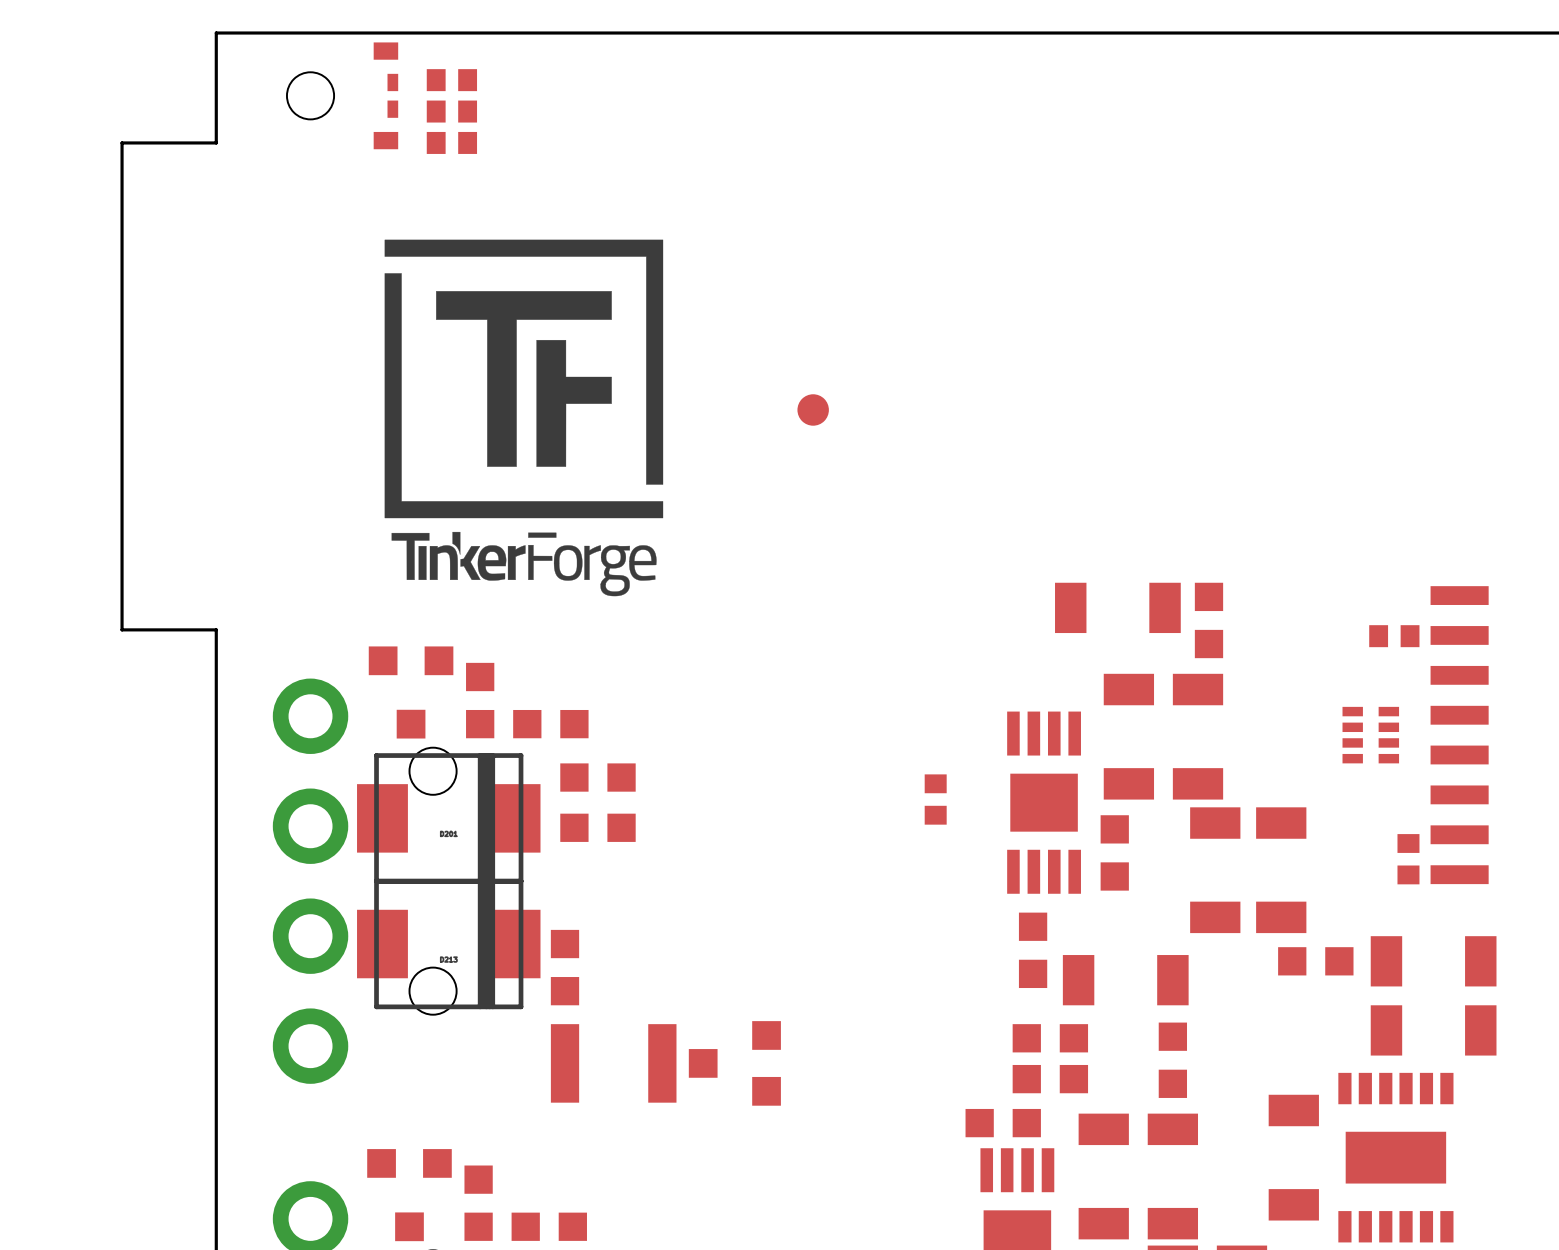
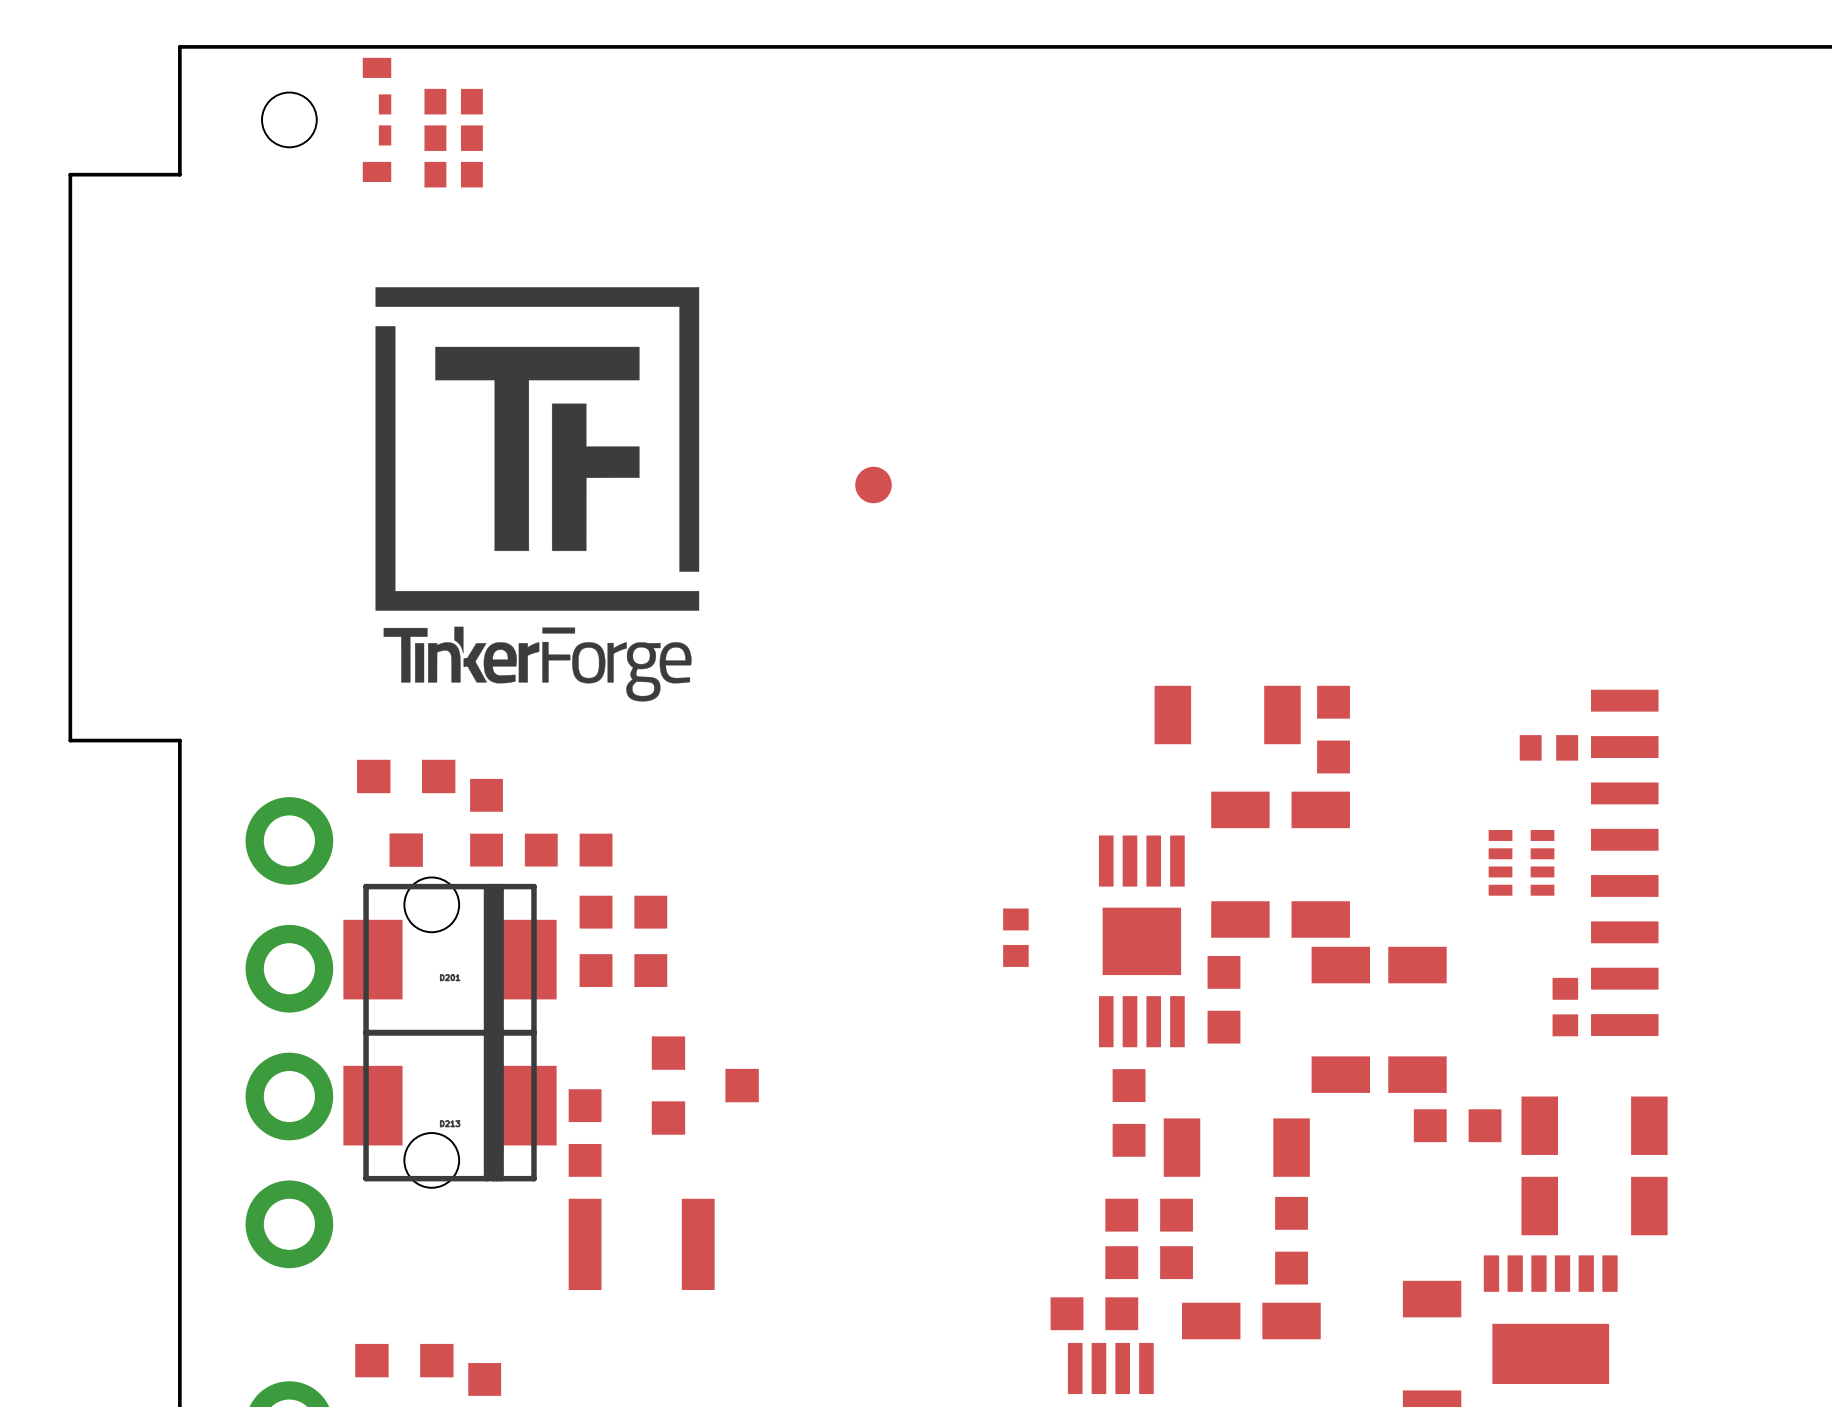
part rotation: 0° (734, 1063) -> 180° (705, 1085)
part position: (734, 1063) -> (705, 1085)

